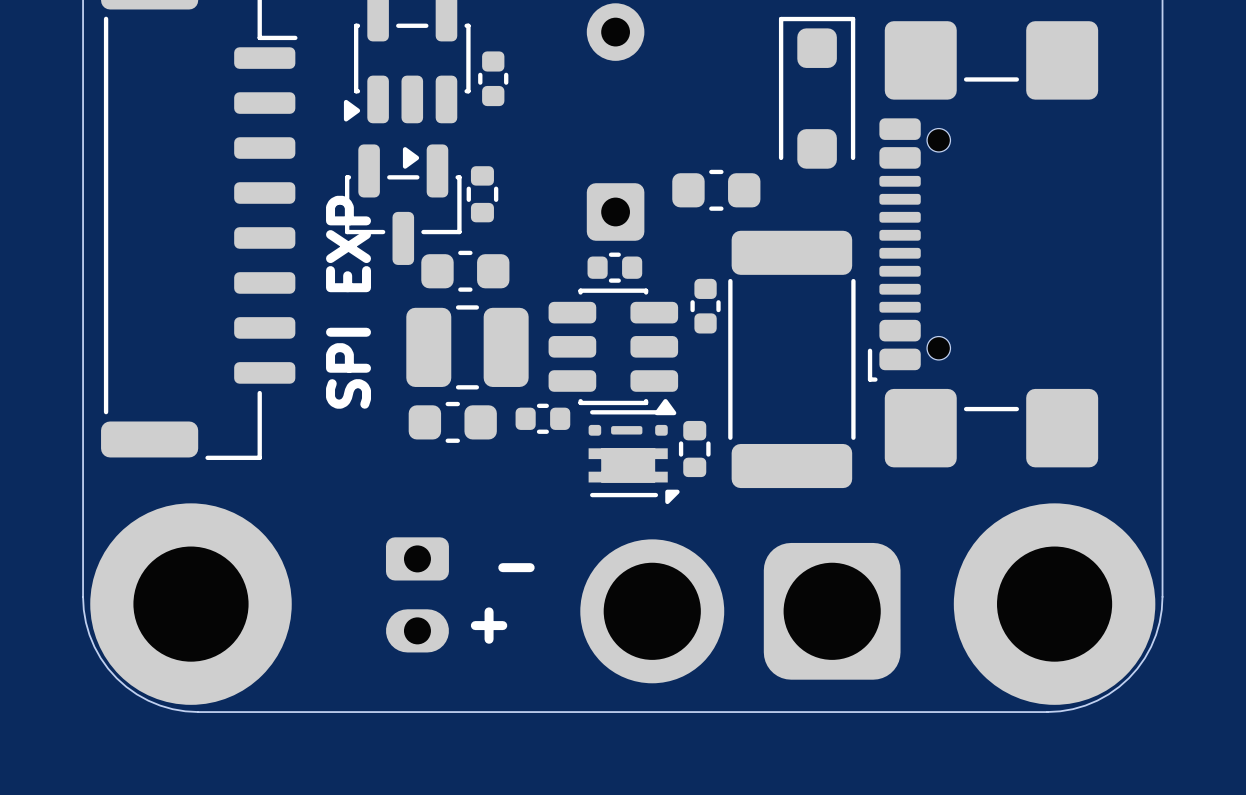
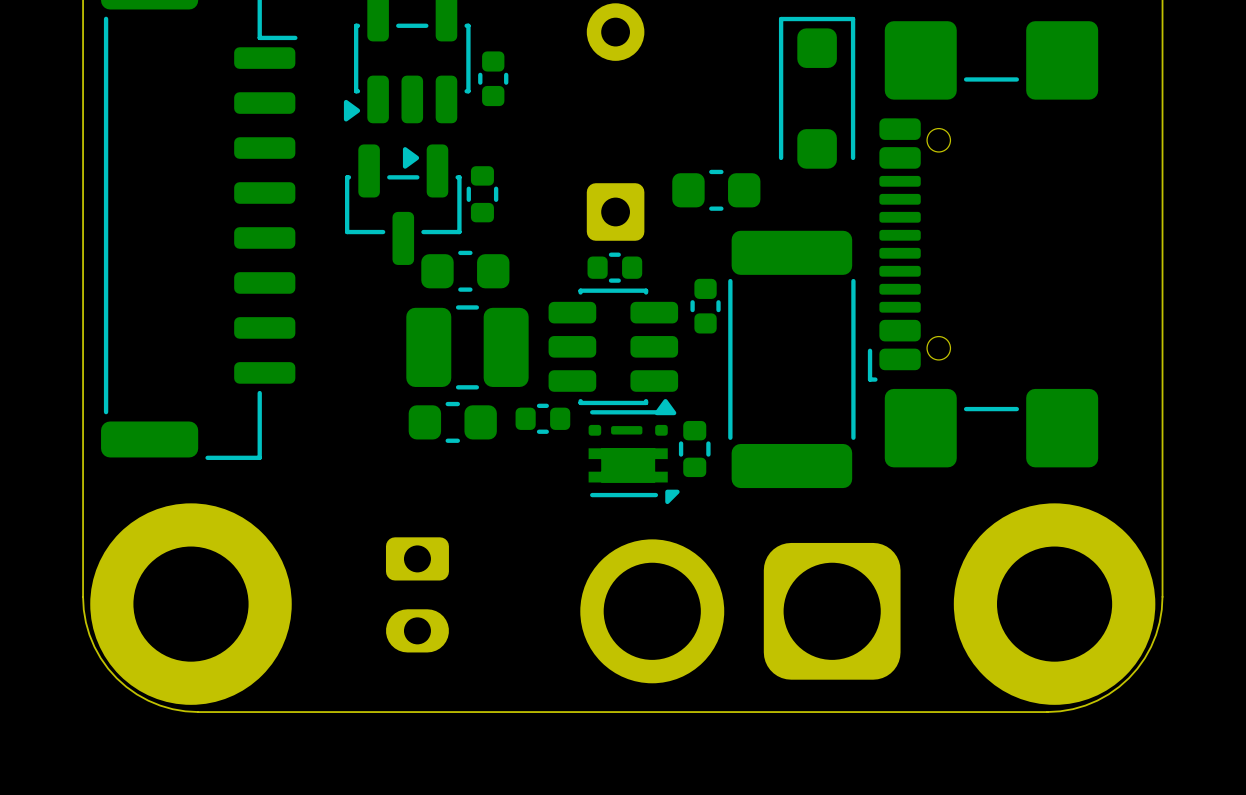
text: SPI EXP (348, 302) -> none
text: - (516, 567) -> none
text: + (489, 625) -> none

